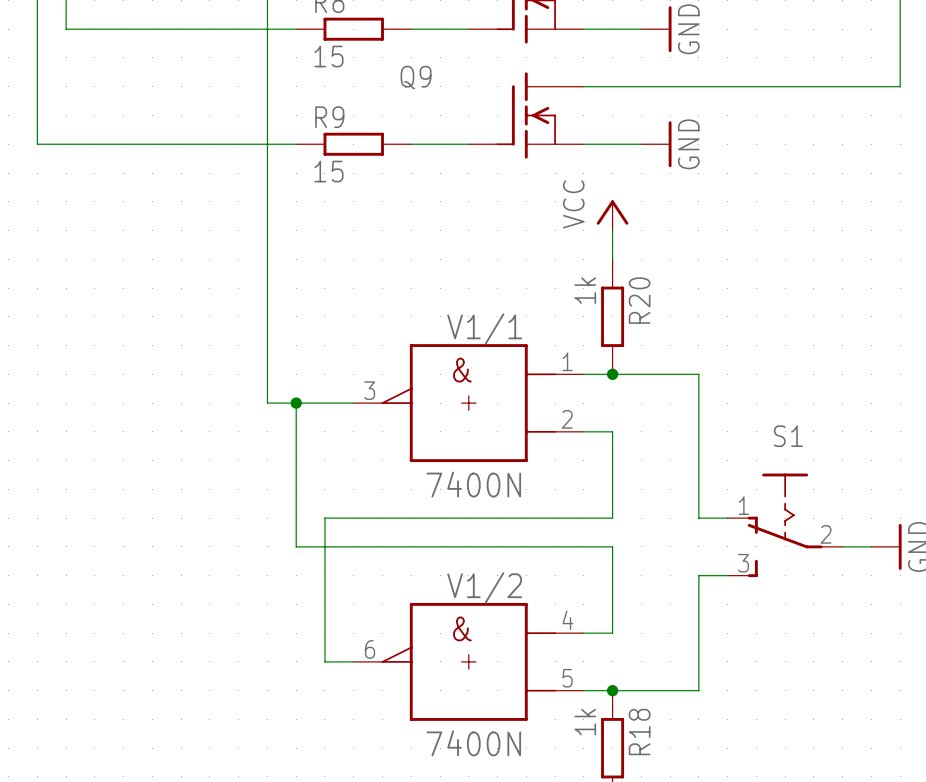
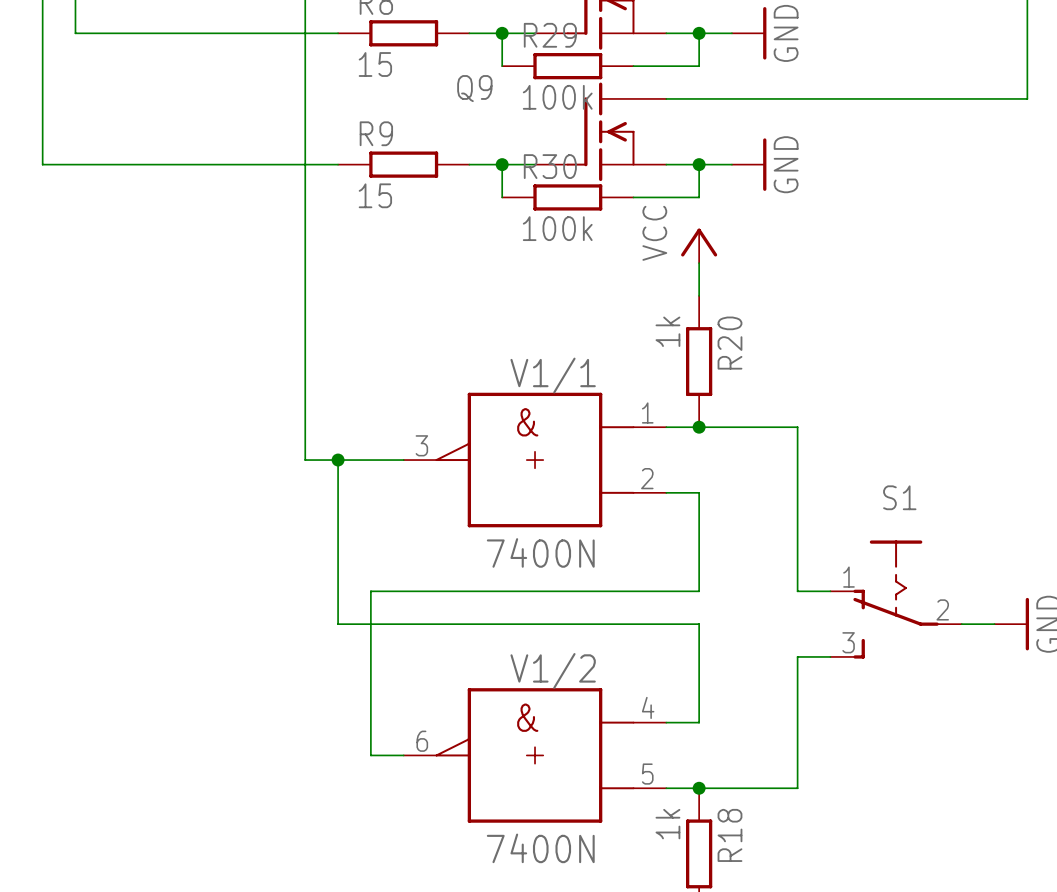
wire: none -> (502, 33) (502, 66)
junction: none -> (502, 33)
wire: none -> (699, 33) (699, 66) (633, 66)
junction: none -> (699, 33)
R29: none -> 100k (567, 66)
wire: none -> (502, 164) (502, 197)
junction: none -> (502, 164)
wire: none -> (699, 164) (699, 197) (633, 197)
junction: none -> (699, 164)
R30: none -> 100k (567, 197)

